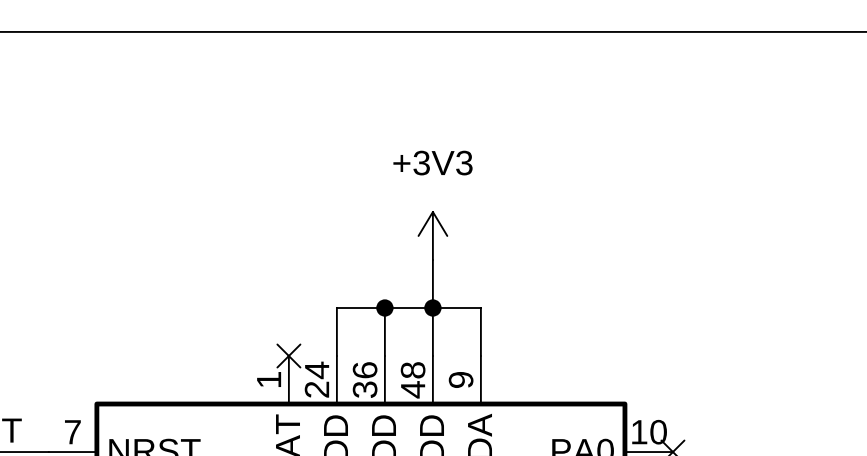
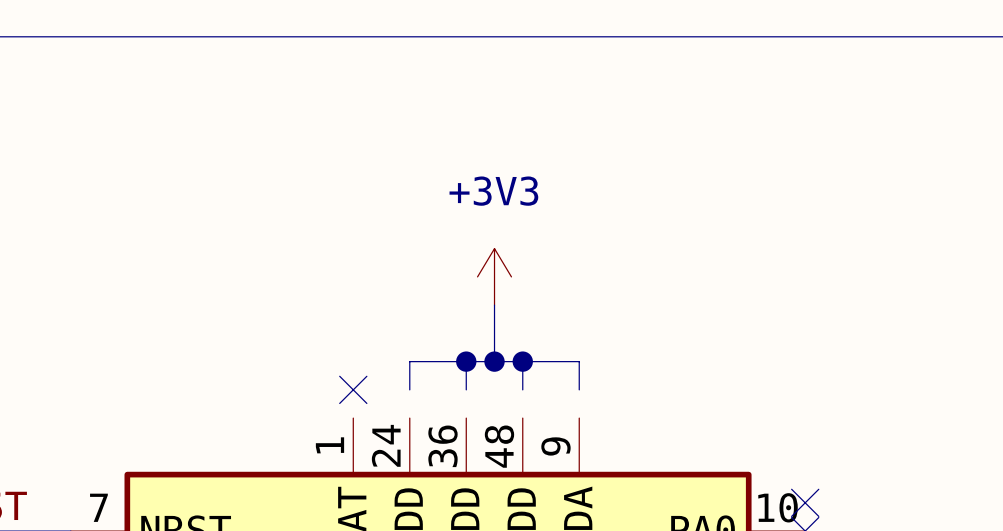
power symbol position: +3V3 (432, 235) -> +3V3 (494, 276)
wire: (432, 259) (432, 308) -> (494, 305) (494, 361)
junction: none -> (494, 361)
wire: (336, 332) (336, 356) -> none
wire: (384, 332) (384, 356) -> none
wire: (432, 332) (432, 356) -> none
wire: (480, 332) (480, 356) -> none
no-connect mark position: (288, 356) -> (353, 389)
no-connect mark: none -> (805, 502)

